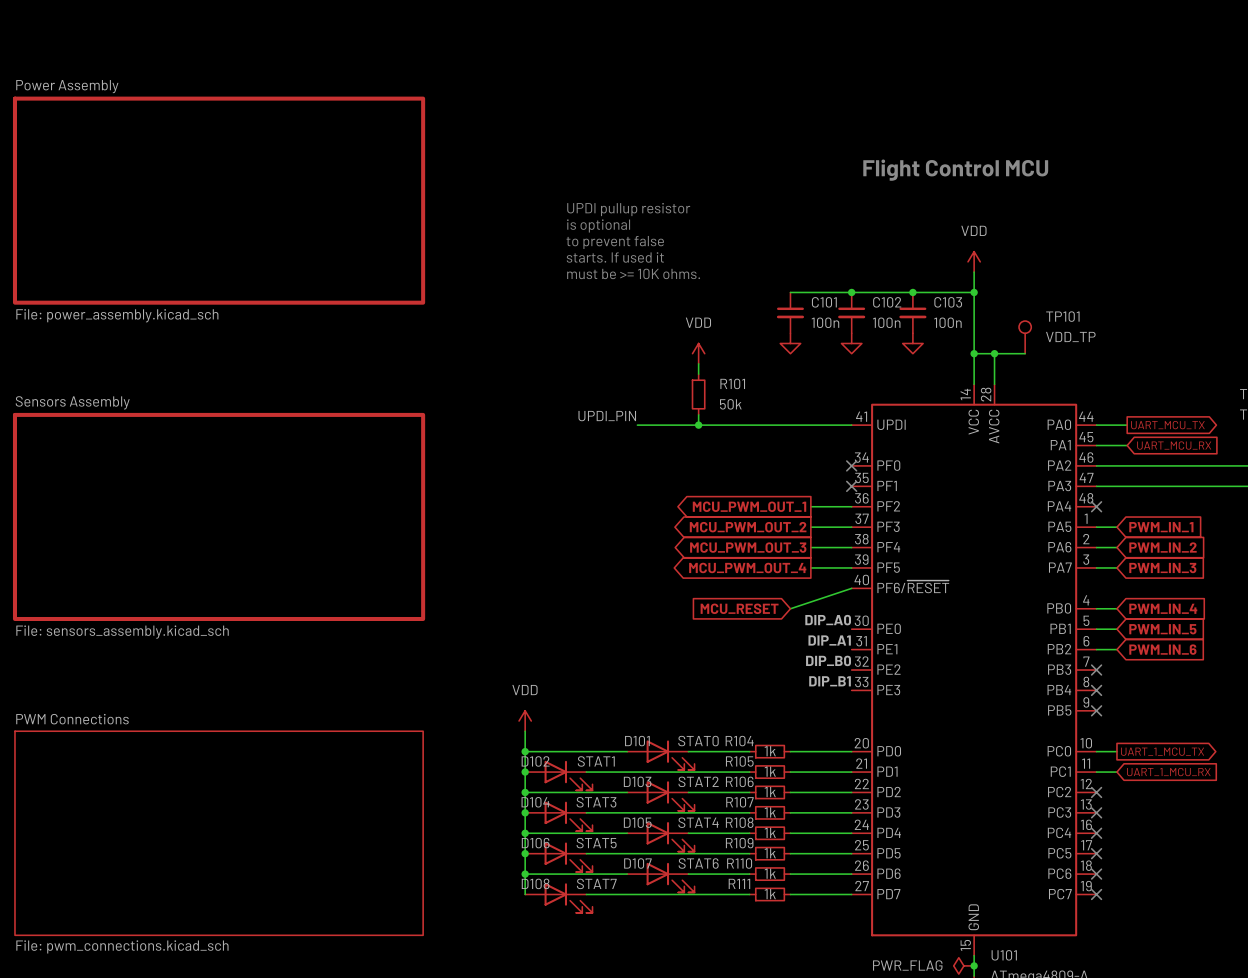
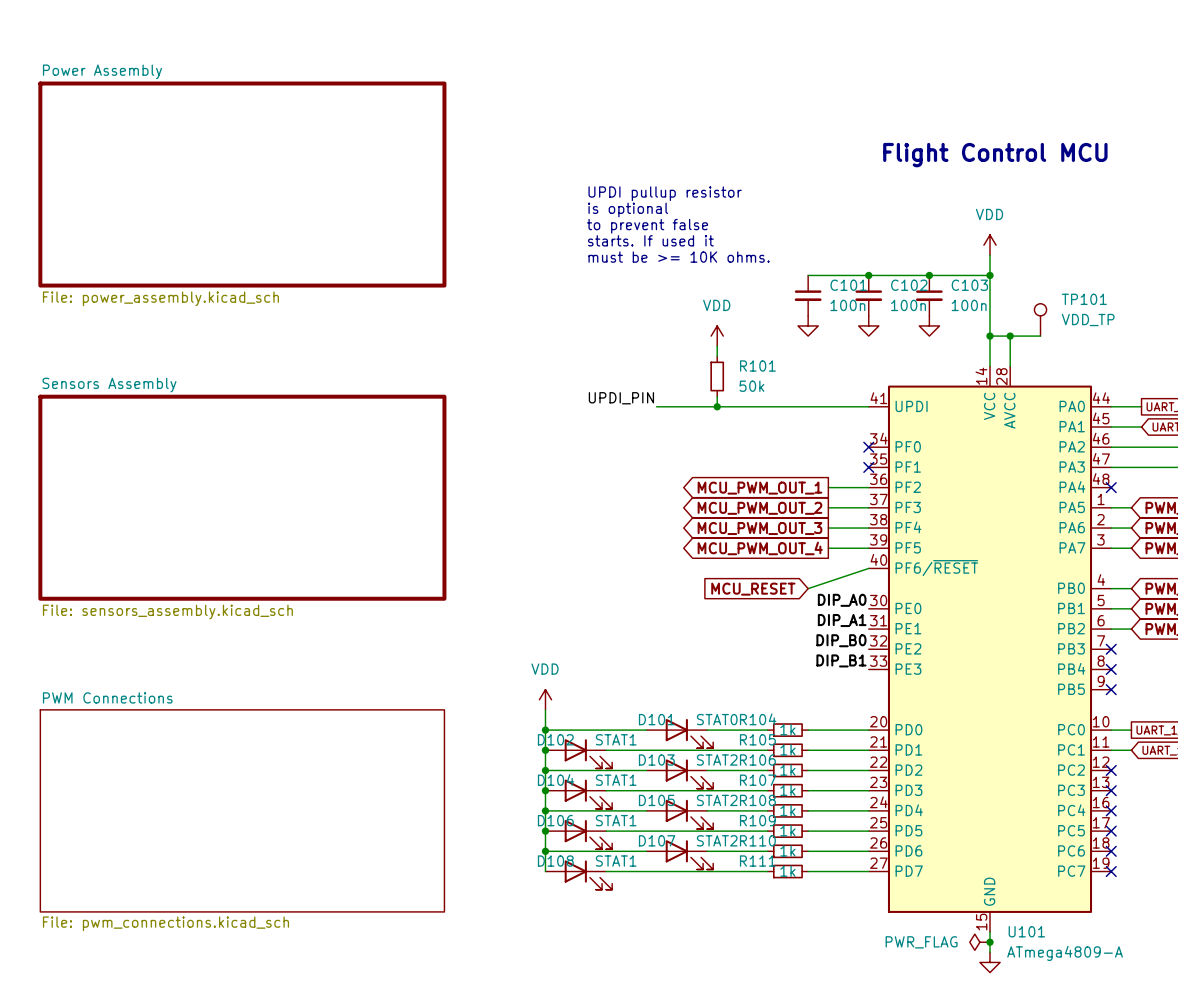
D104 value: STAT3 (596, 802) -> STAT1 (616, 780)
D105 value: STAT4 (698, 822) -> STAT2 (717, 800)
D106 value: STAT5 (596, 843) -> STAT1 (616, 820)
D107 value: STAT6 (698, 863) -> STAT2 (717, 840)
D108 value: STAT7 (596, 883) -> STAT1 (616, 861)

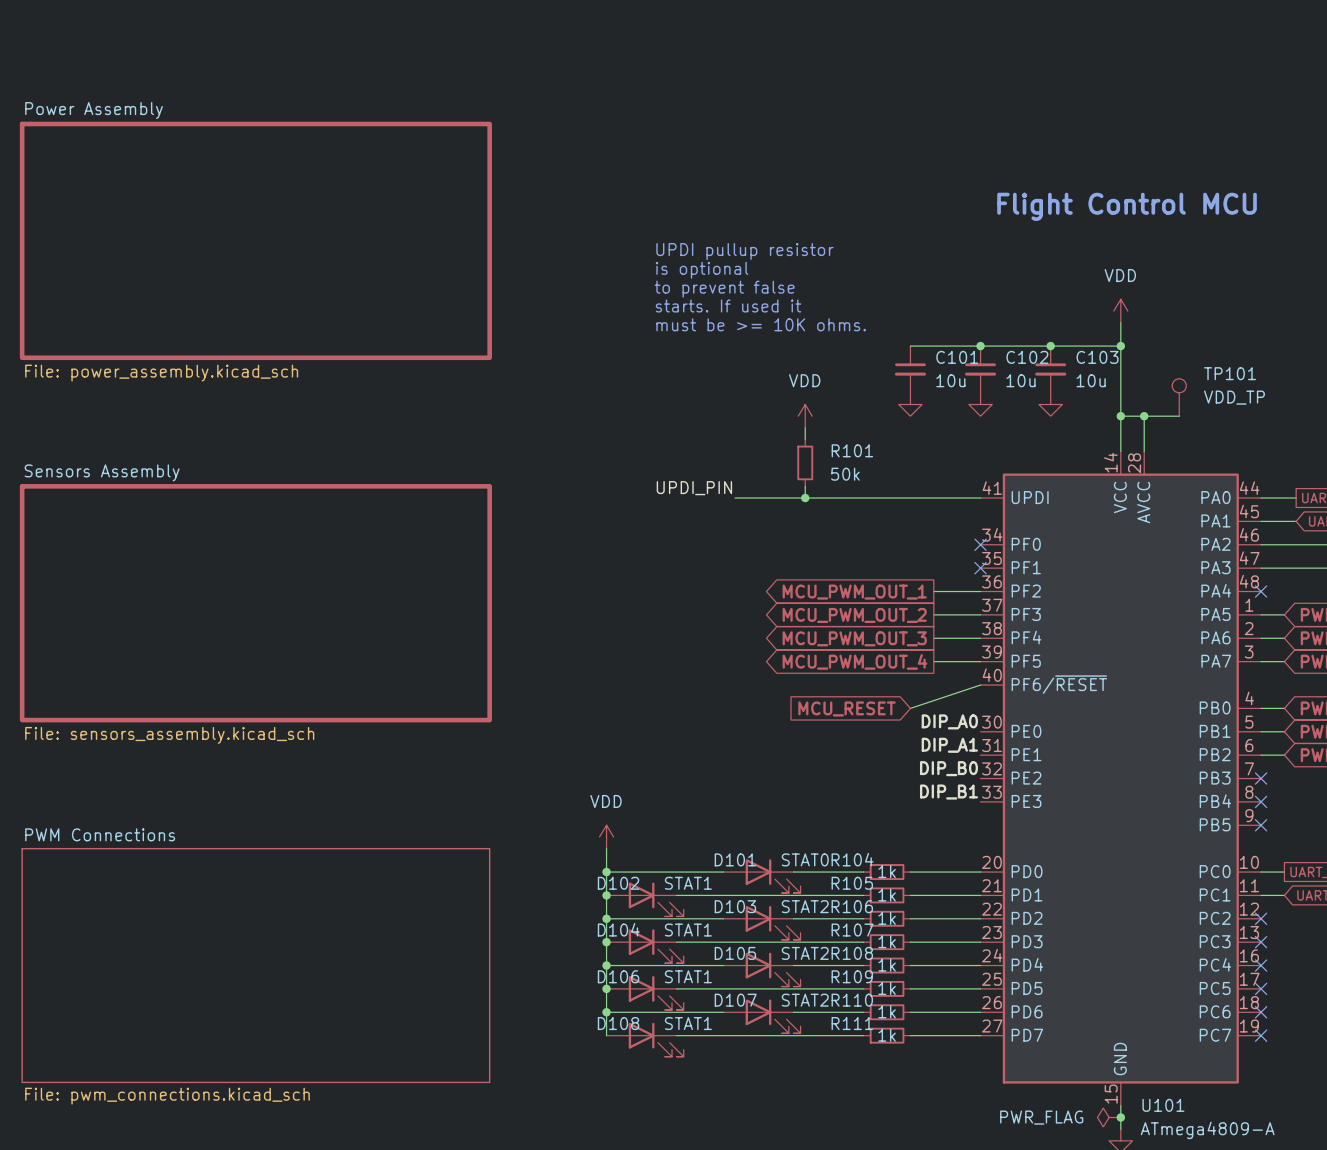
C101 value: 100n (847, 305) -> 10u (950, 380)
C102 value: 100n (908, 305) -> 10u (1021, 380)
C103 value: 100n (969, 305) -> 10u (1091, 380)

